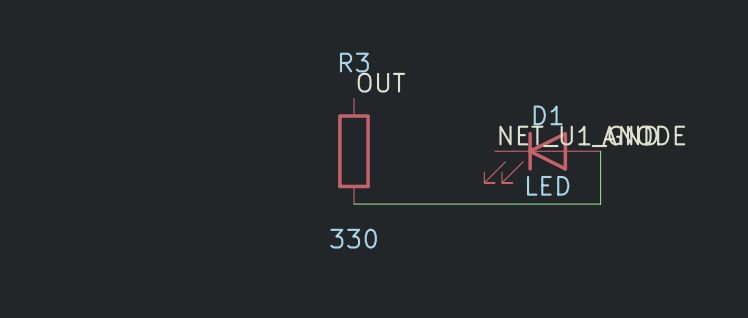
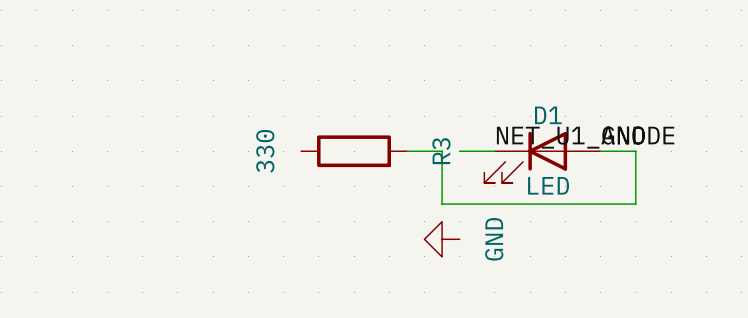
label: OUT (381, 82) -> none
R3 rotation: 0° (354, 151) -> 90° clockwise (354, 151)
wire: none -> (459, 151) (494, 151)
wire: (600, 151) (600, 204) -> (600, 151) (635, 151) (635, 204) (600, 204)
wire: (354, 204) (442, 204) -> (406, 151) (442, 151) (442, 204)
power symbol: none -> GND (442, 239)

